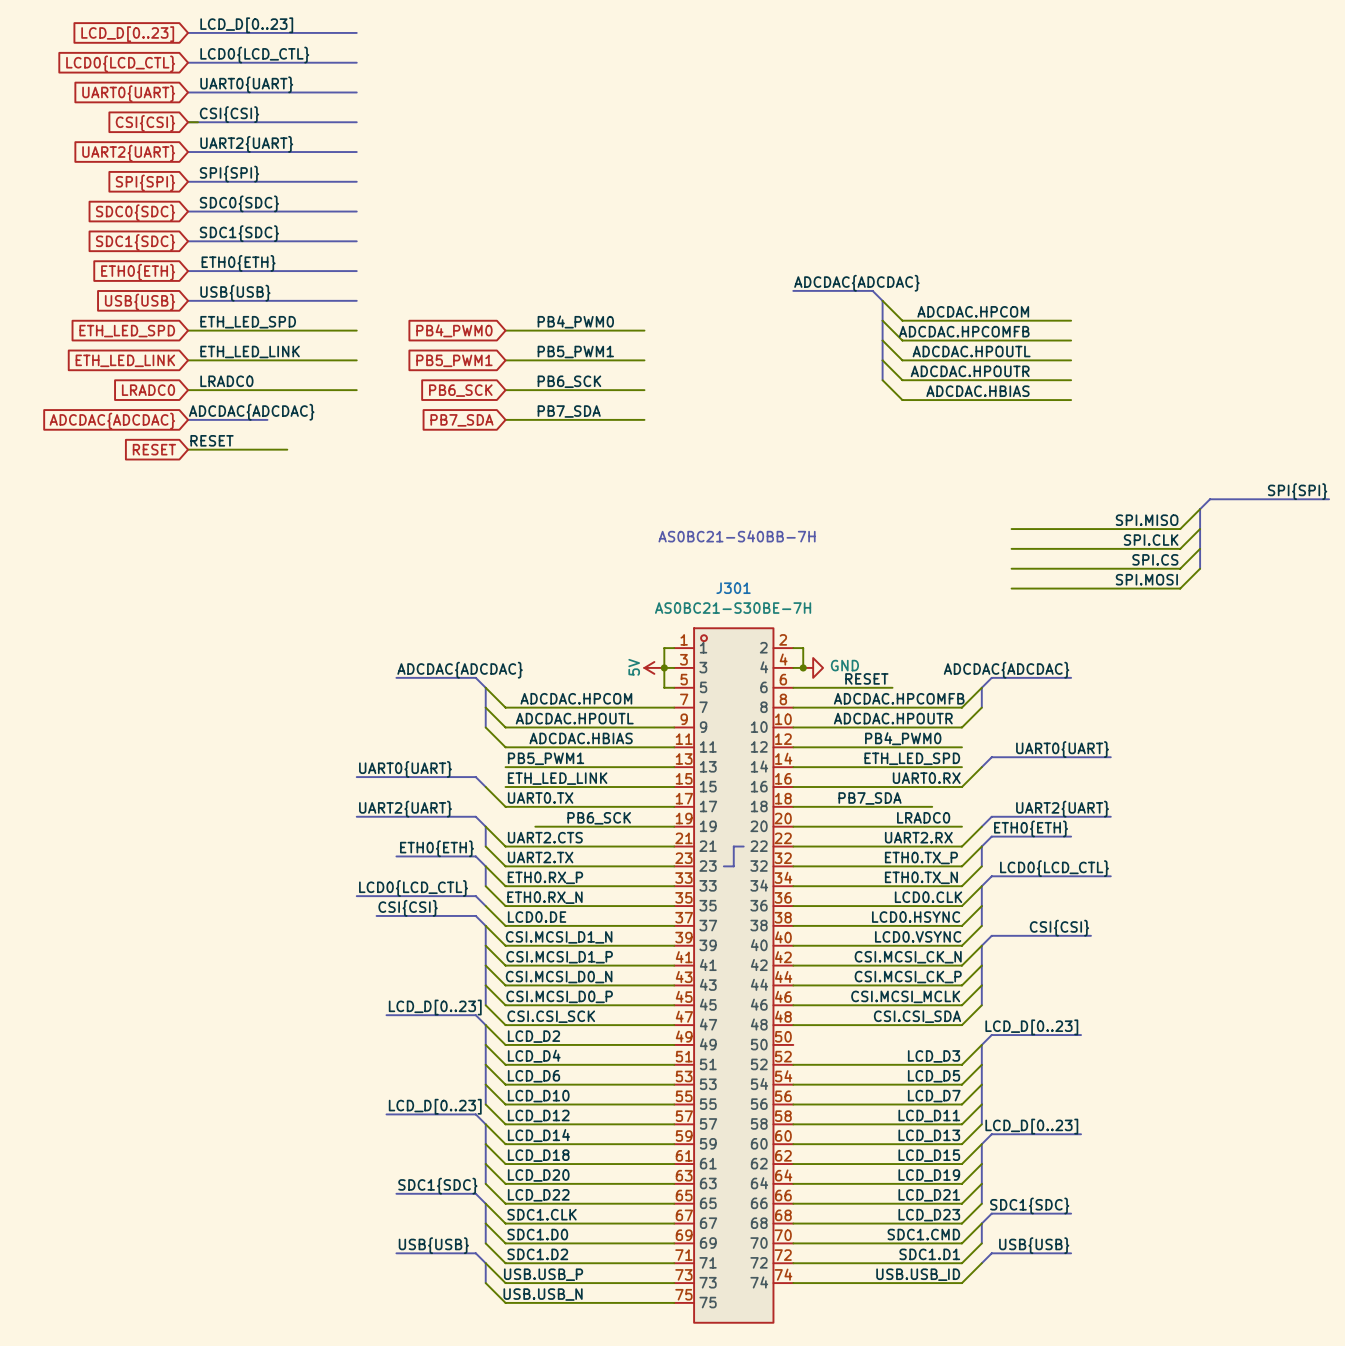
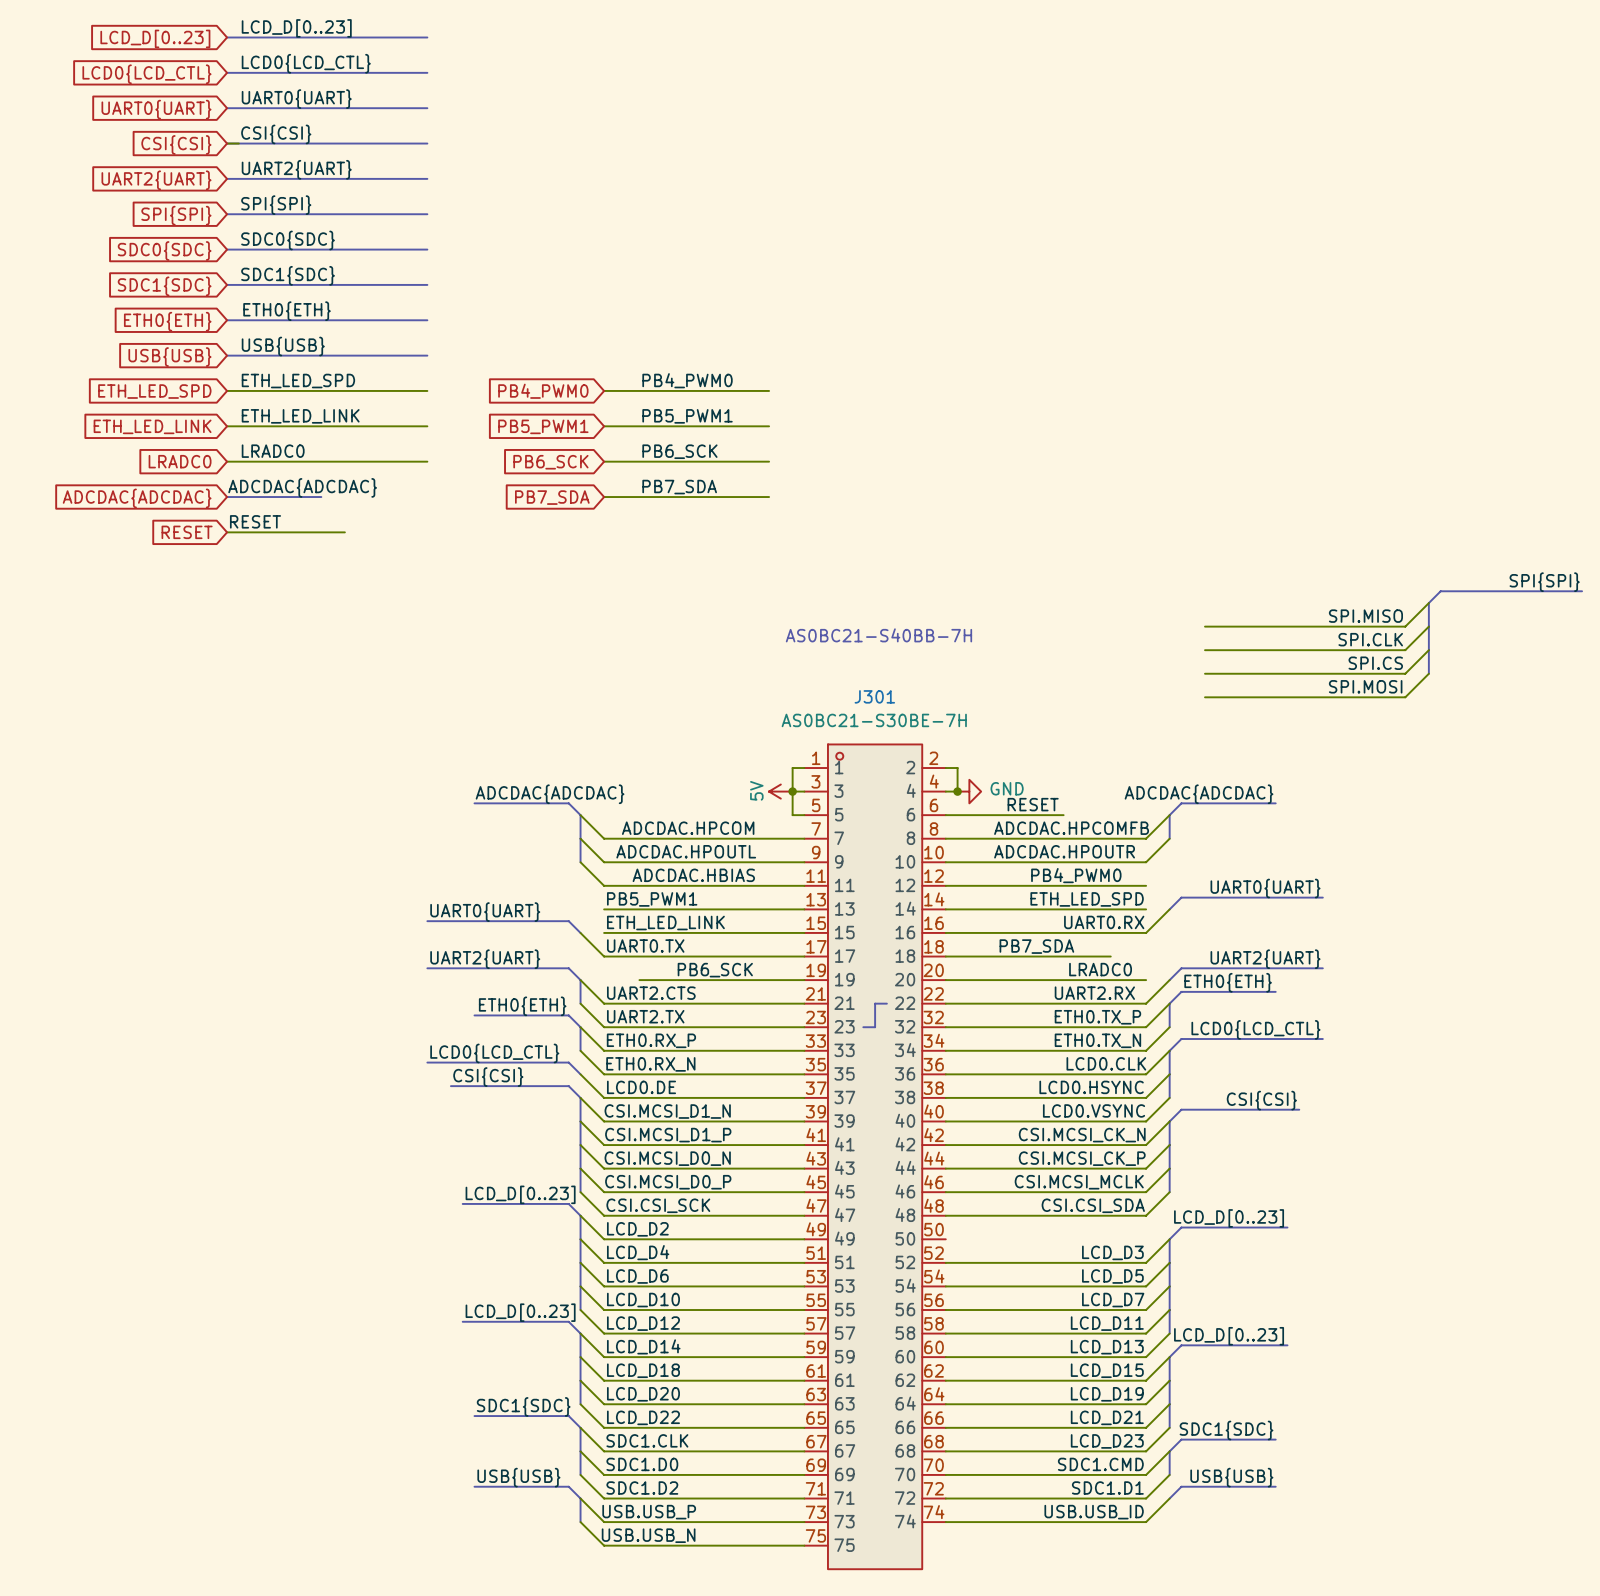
label: ADCDAC{ADCDAC} (856, 283) -> none
bus: (793, 290) (872, 290) (882, 300) (882, 380) -> none
wire: (882, 300) (902, 320) (1071, 320) -> none
label: ADCDAC.HPCOM (973, 311) -> none
wire: (882, 320) (902, 340) (1071, 340) -> none
label: ADCDAC.HPCOMFB (964, 331) -> none
wire: (882, 340) (902, 360) (1071, 360) -> none
label: ADCDAC.HPOUTL (971, 351) -> none
wire: (882, 360) (902, 380) (1071, 380) -> none
label: ADCDAC.HPOUTR (970, 371) -> none
wire: (882, 380) (902, 400) (1071, 400) -> none
label: ADCDAC.HBIAS (977, 391) -> none

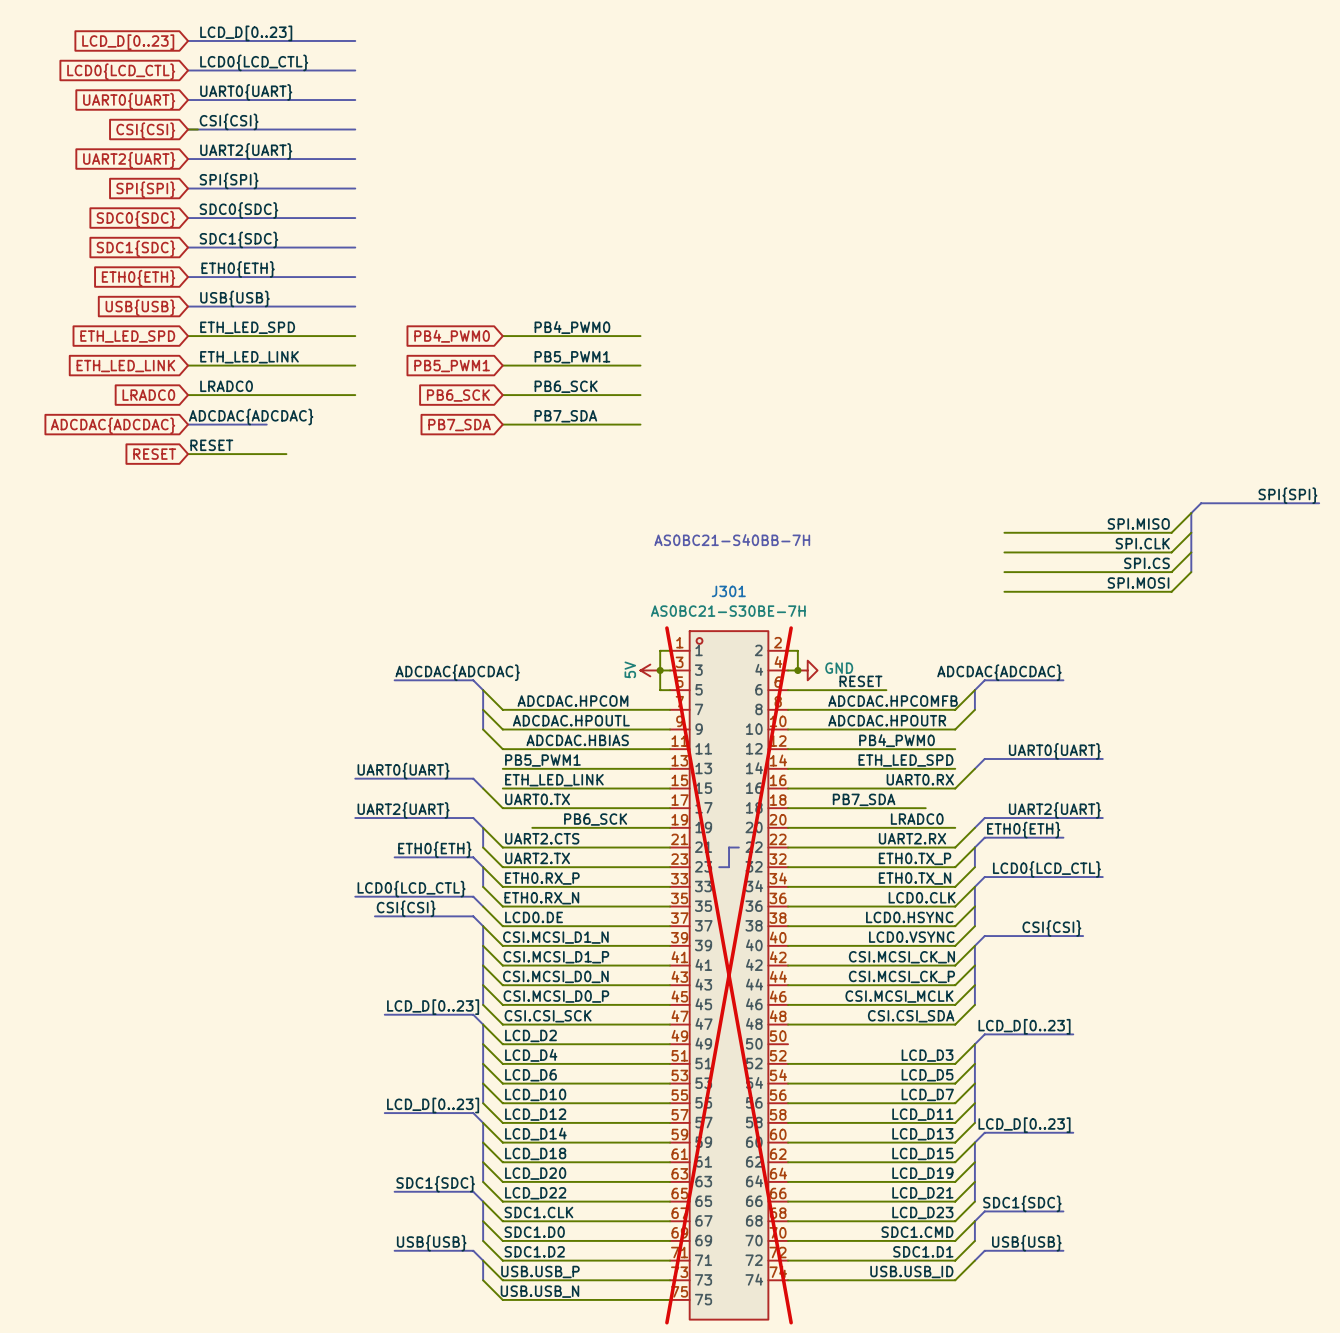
J301 do-not-place cross: none -> (729, 975)

